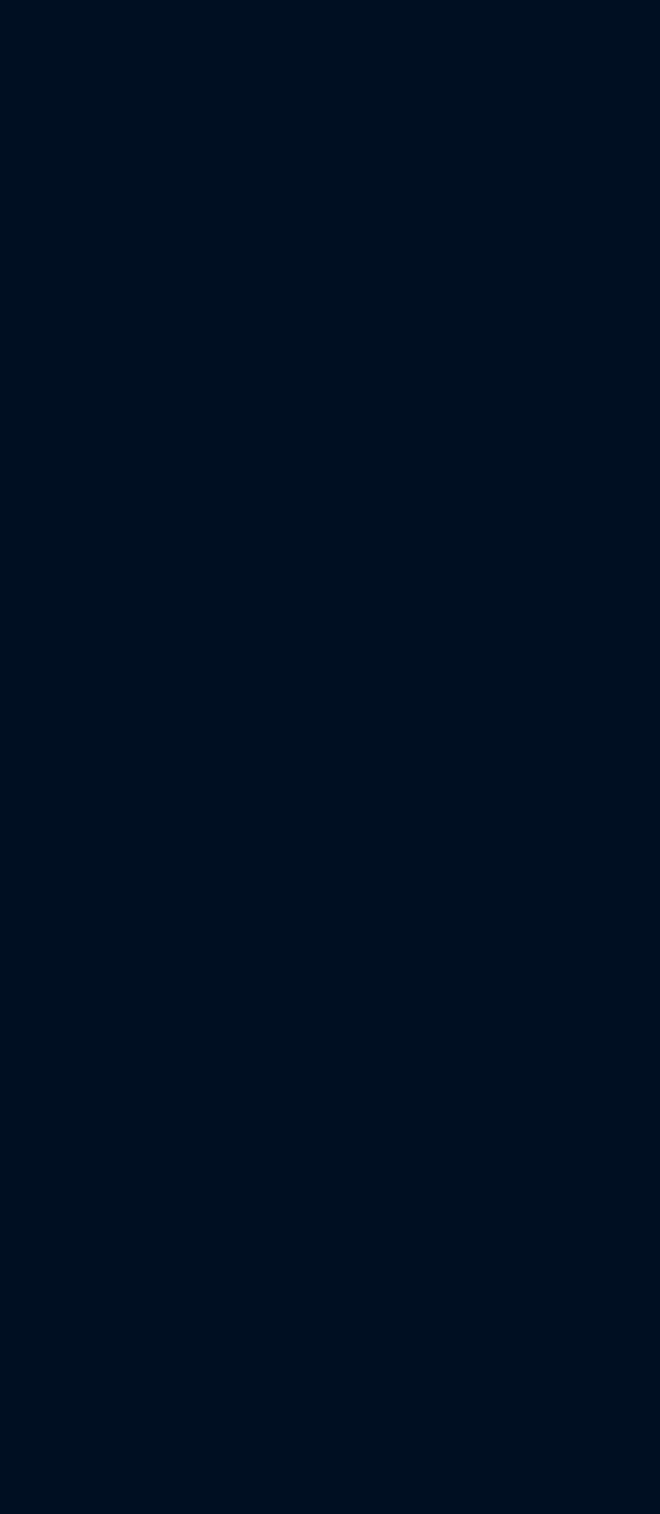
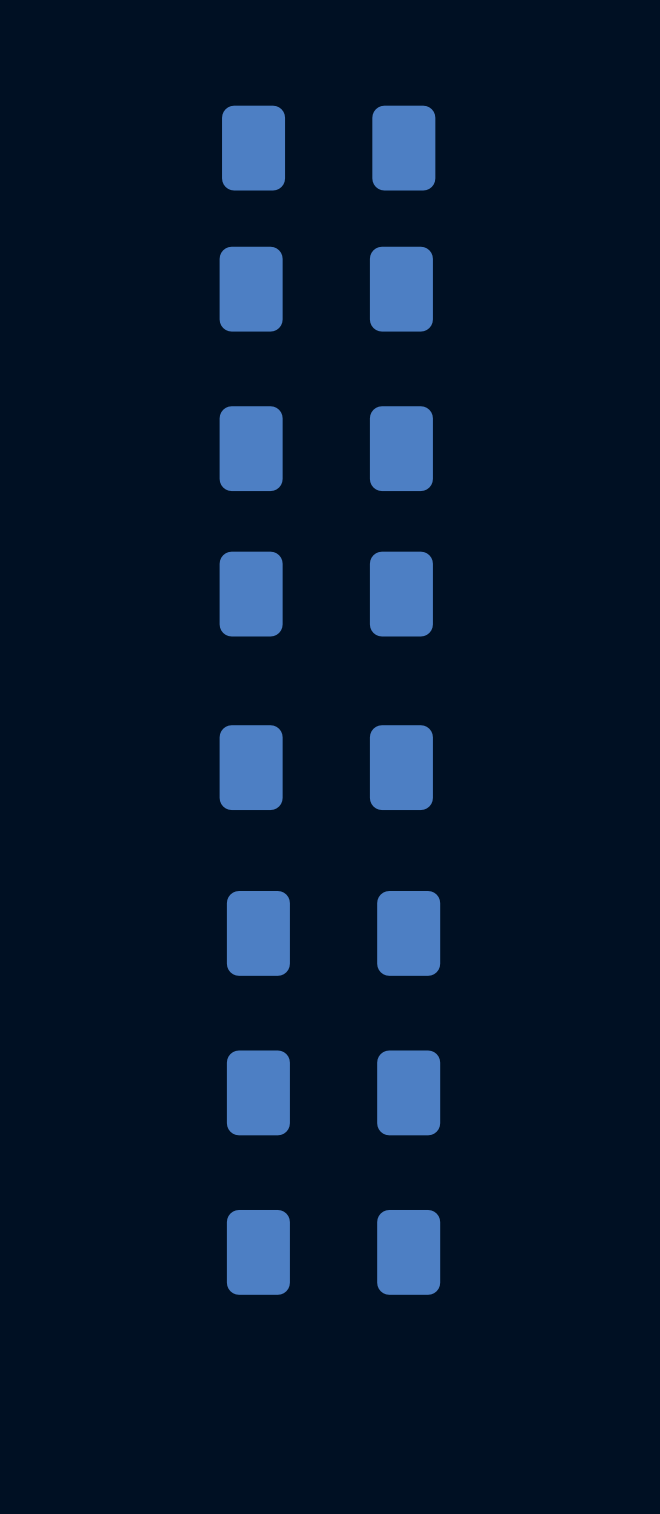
part: none -> (328, 148)
part: none -> (326, 289)
part: none -> (326, 448)
part: none -> (326, 594)
part: none -> (326, 767)
part: none -> (333, 933)
part: none -> (333, 1092)
part: none -> (333, 1252)

